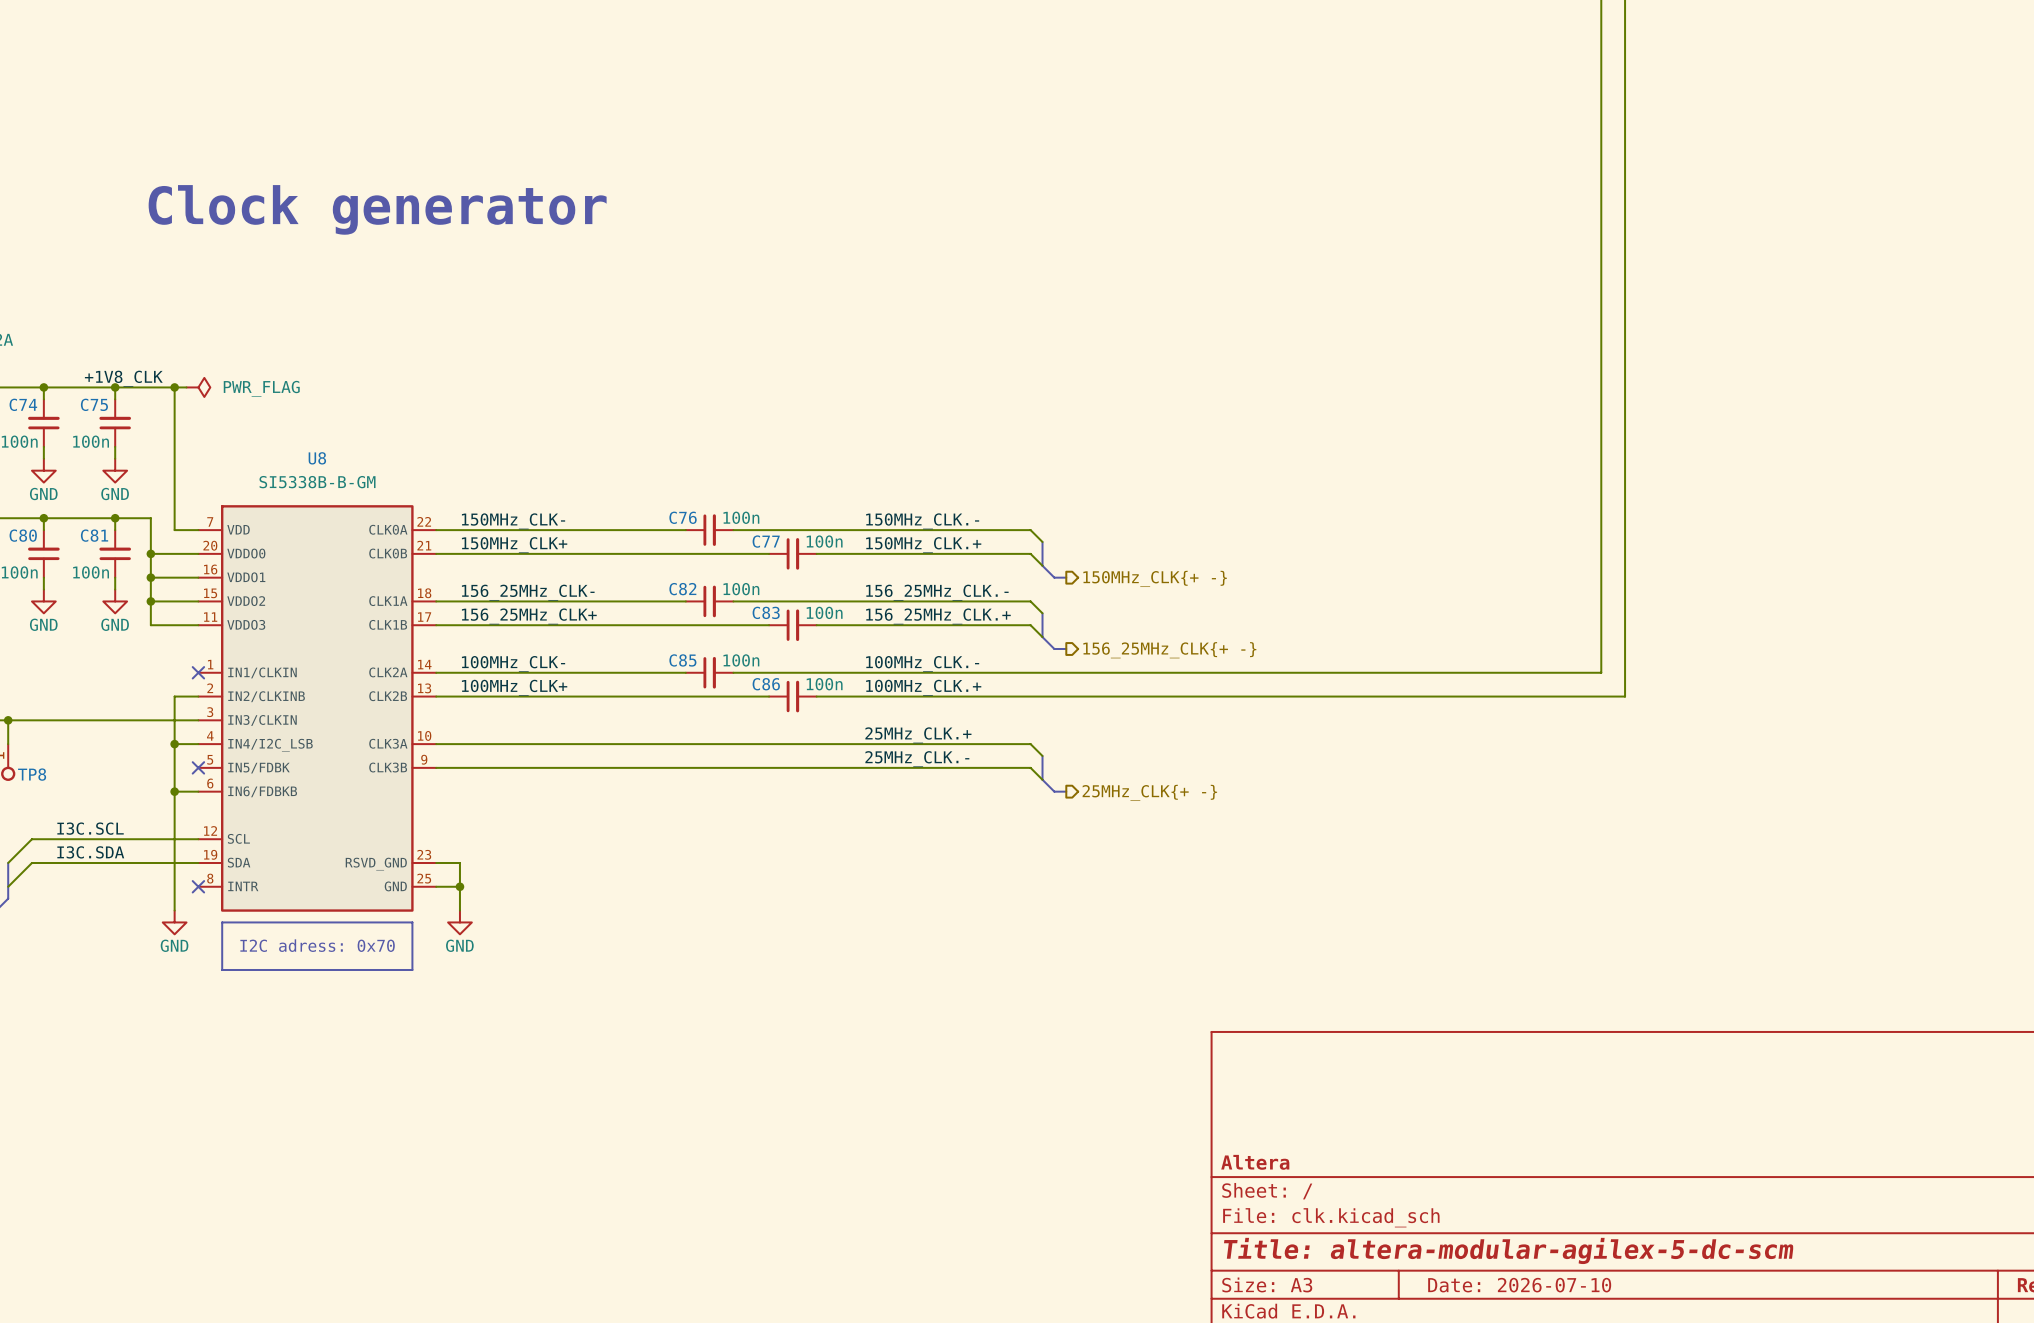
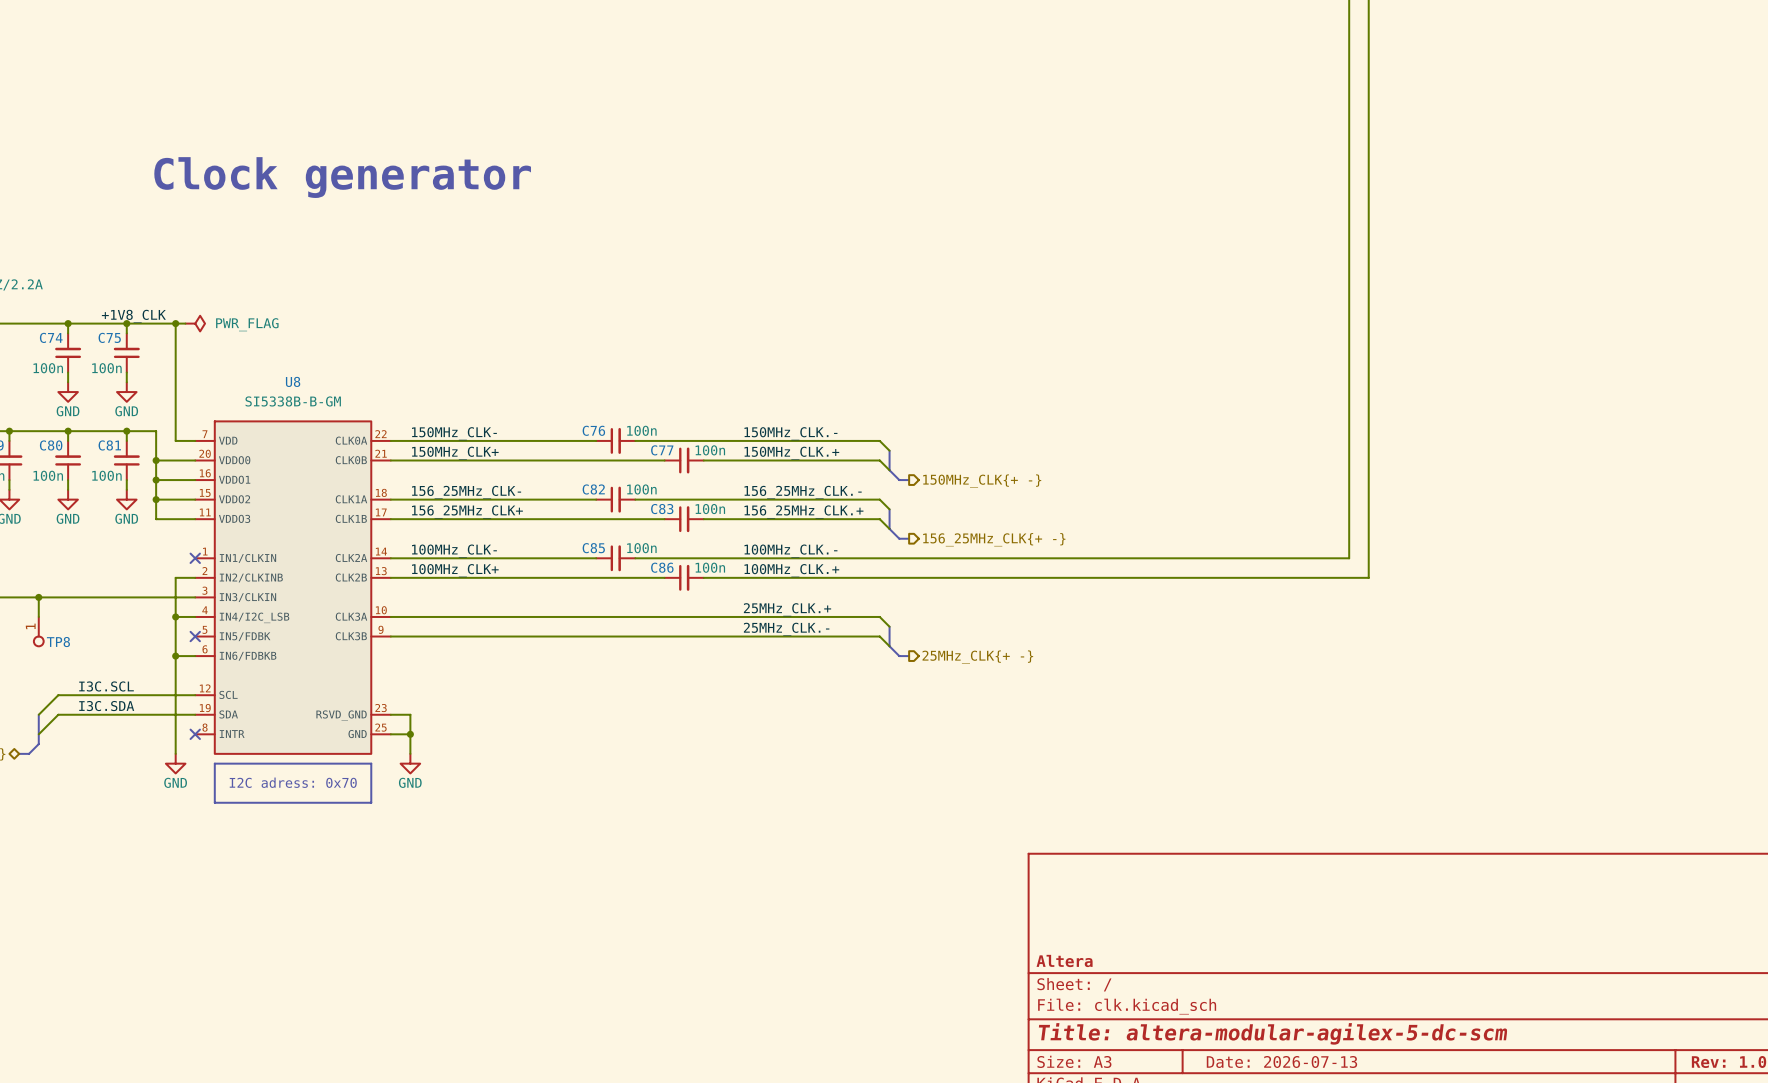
title block: Date: 2026-07-10 (1519, 1285) -> Date: 2026-07-13 (1281, 1061)

